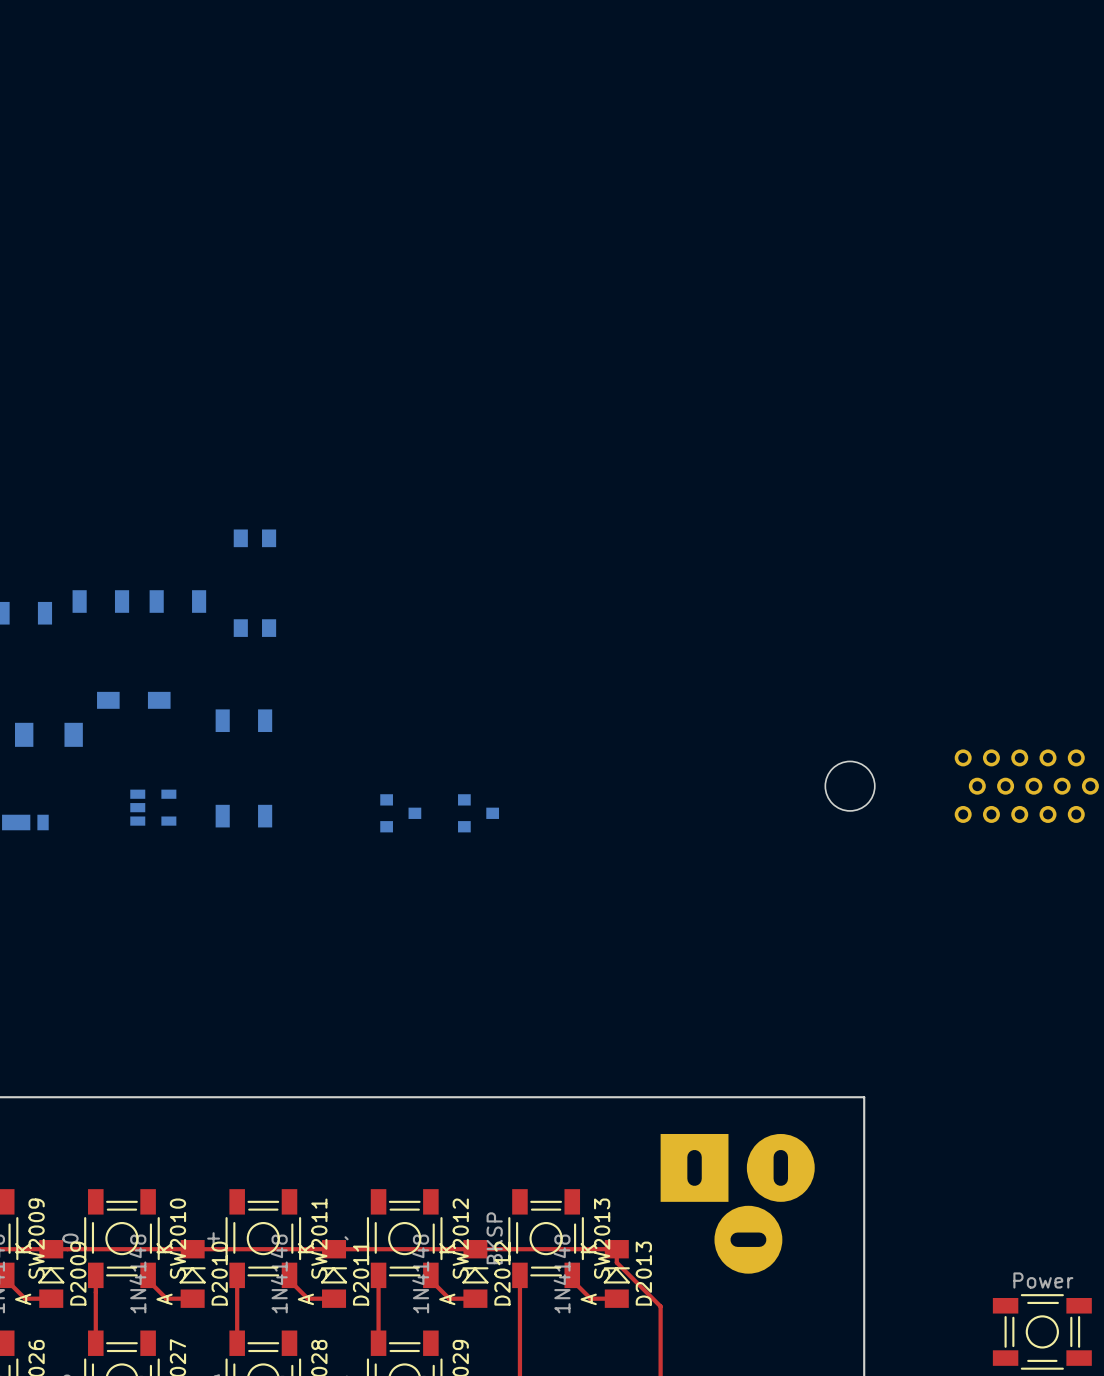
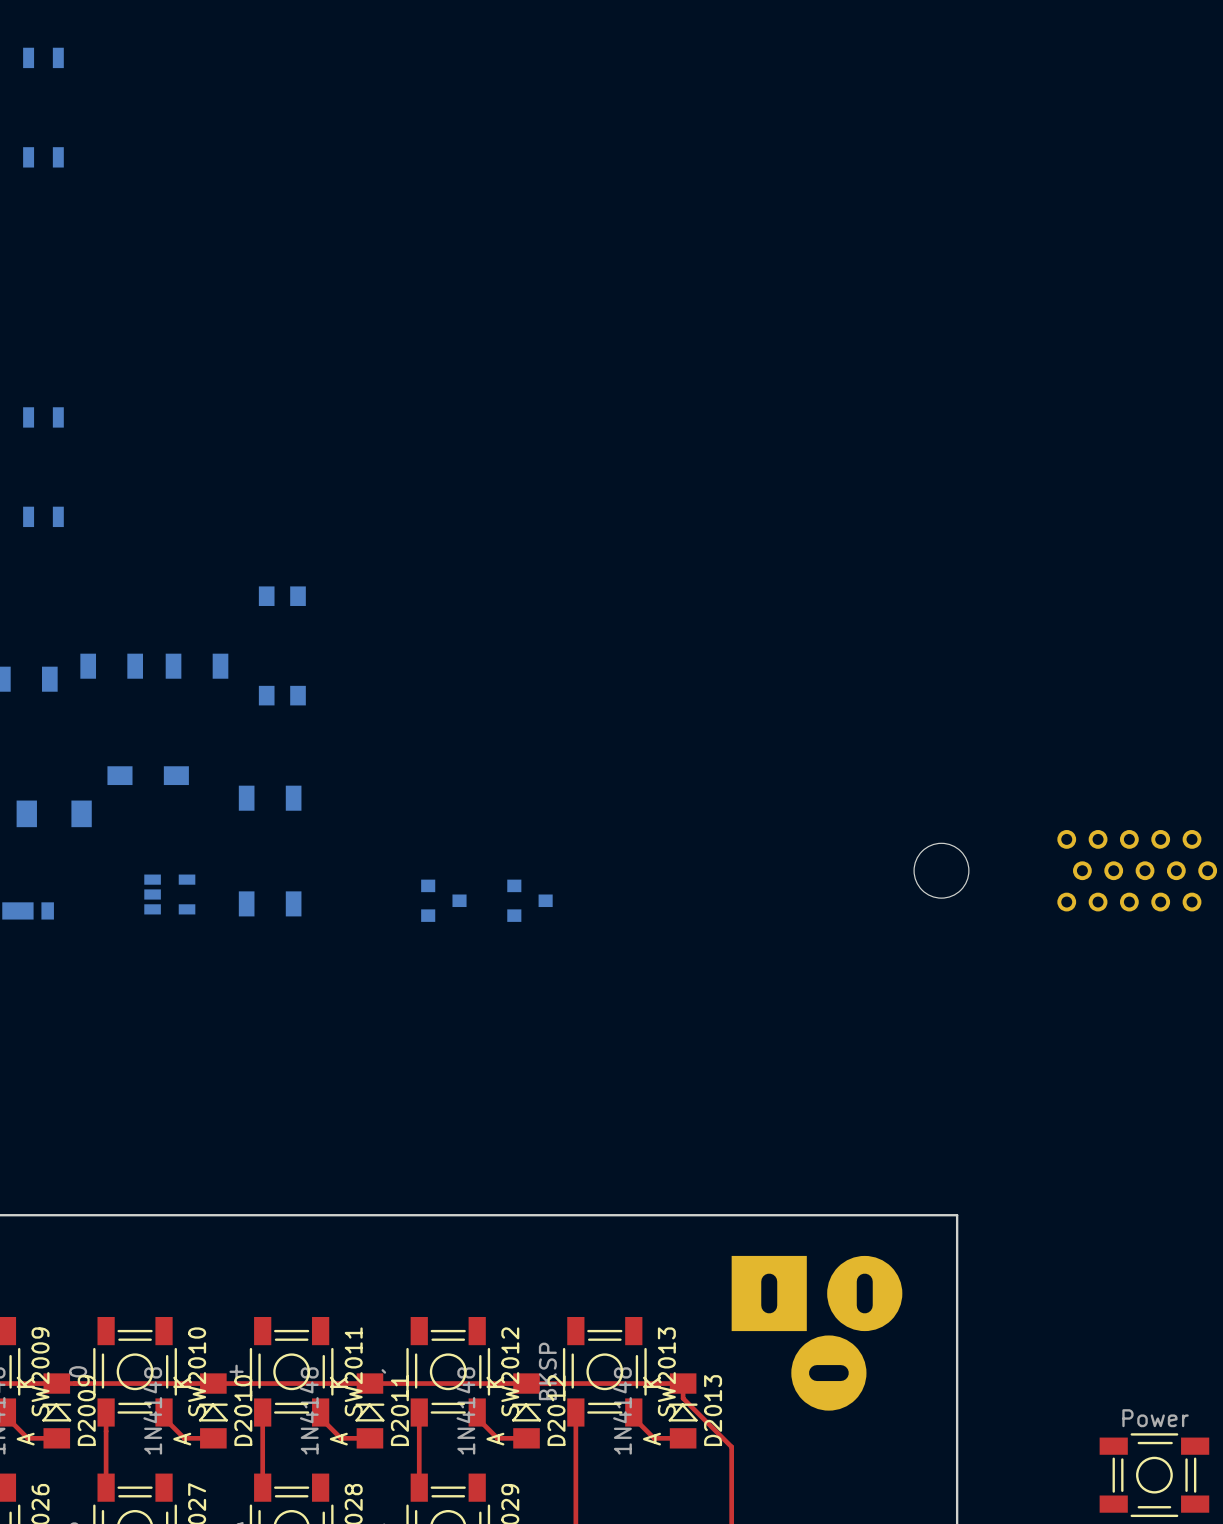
part: none -> (43, 57)
part: none -> (43, 157)
part: none -> (43, 417)
part: none -> (43, 516)

